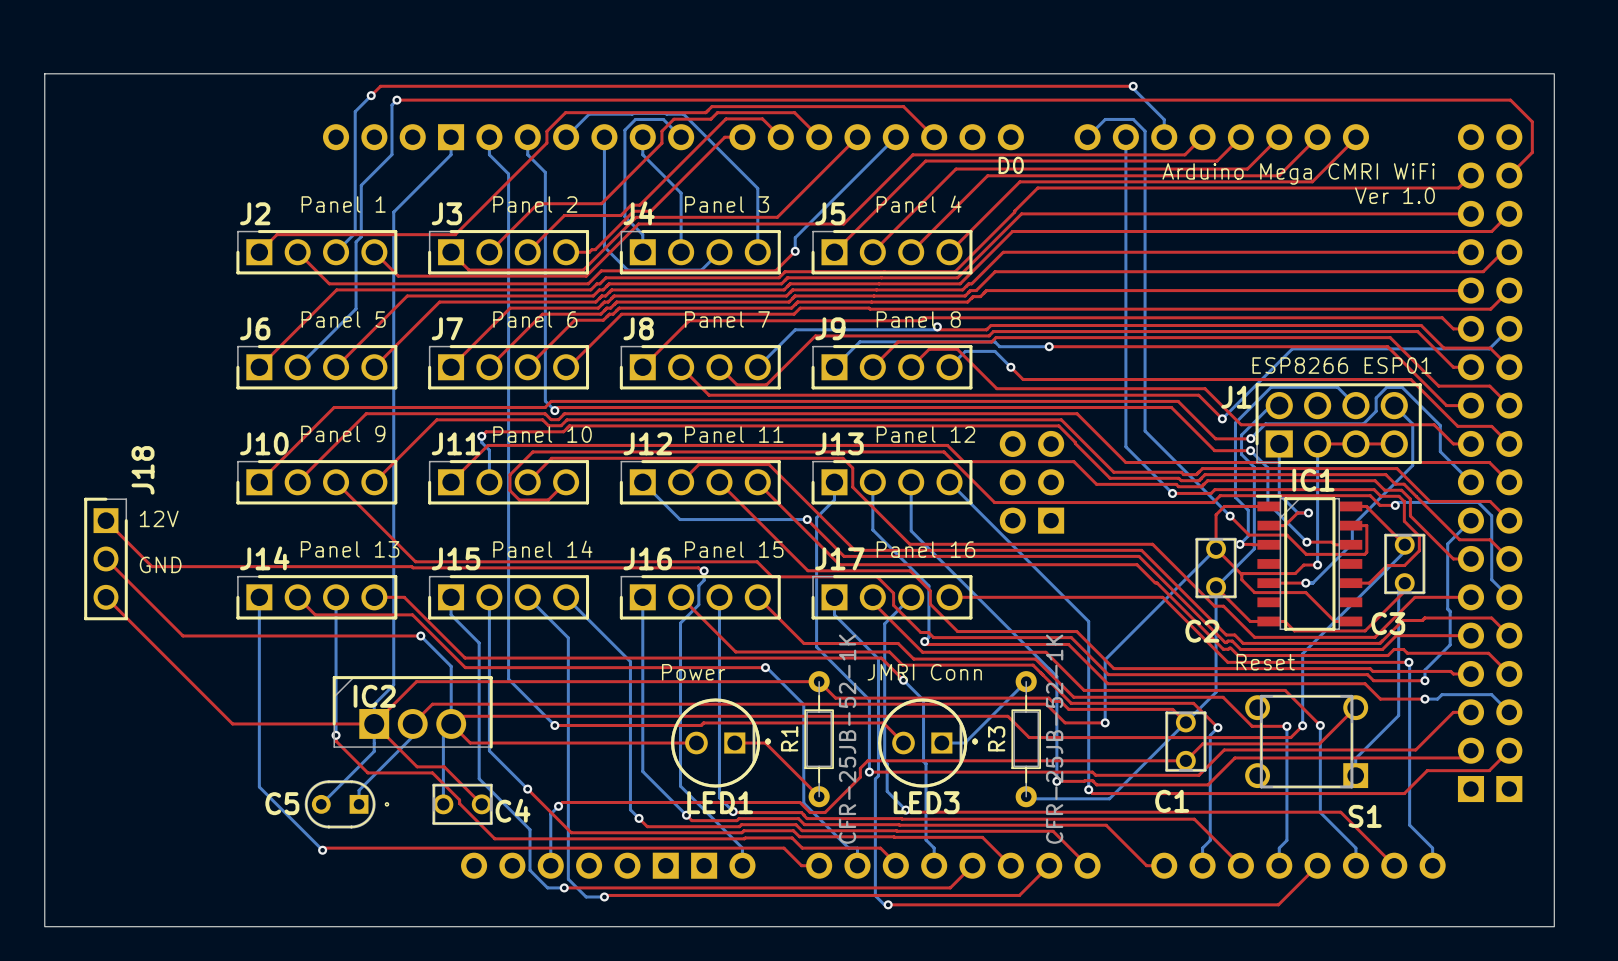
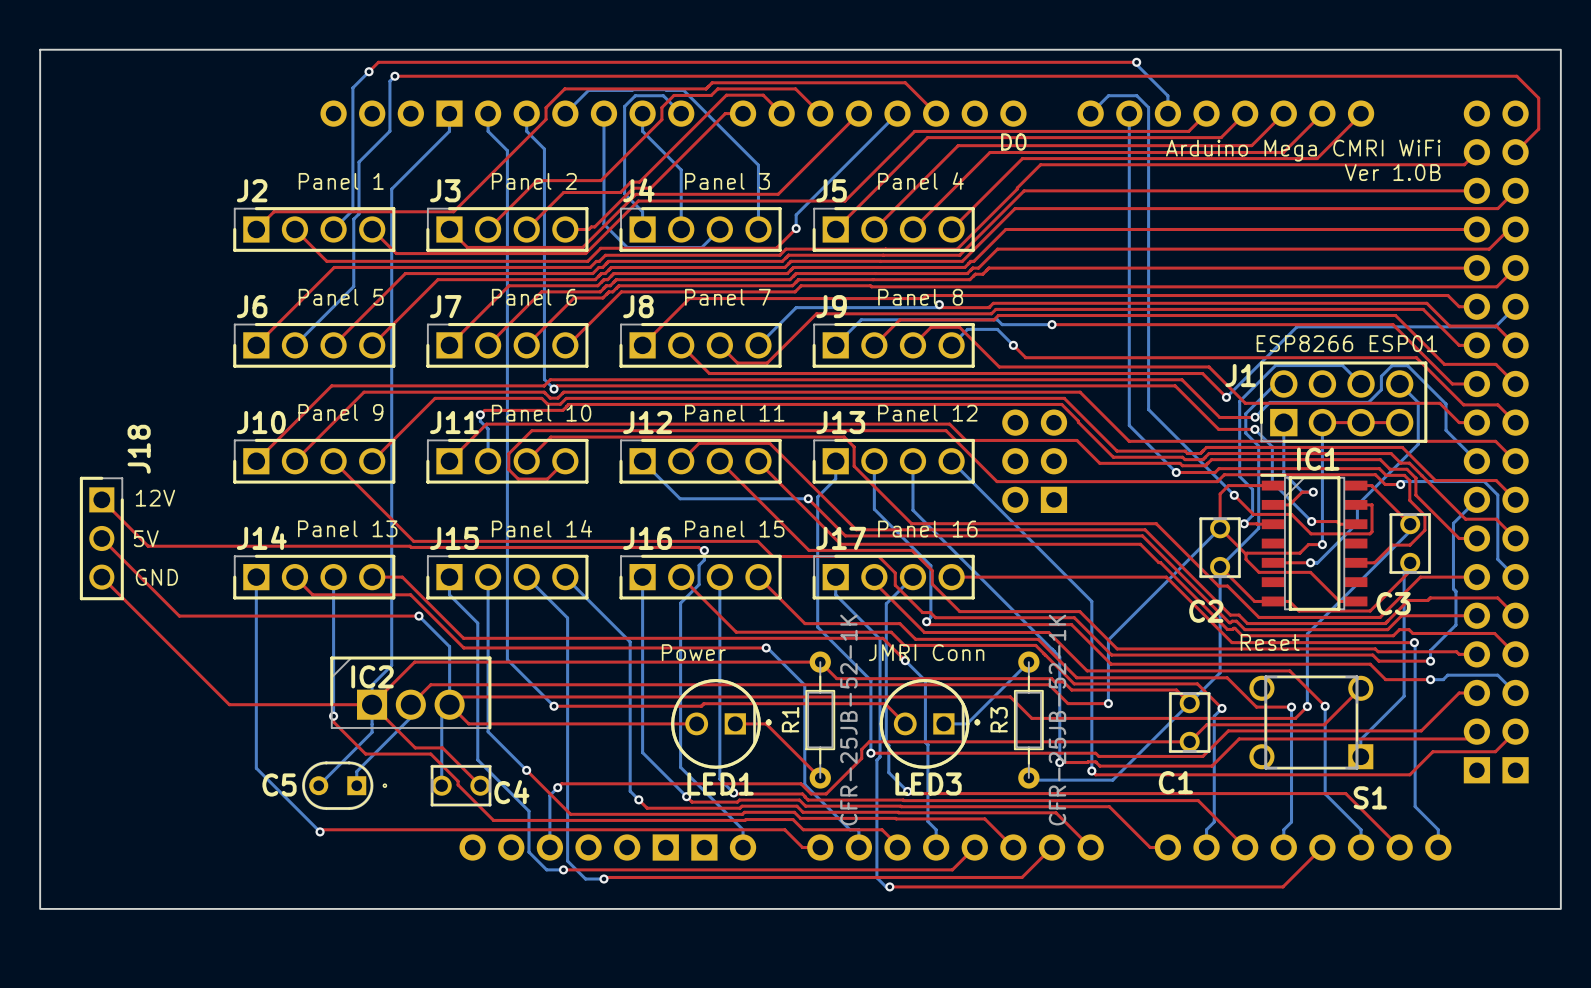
text: Ver 1.0 (1394, 195) -> Ver 1.0B (1392, 172)
text: GND (160, 564) -> 5V (146, 538)
text: none -> GND (156, 577)

